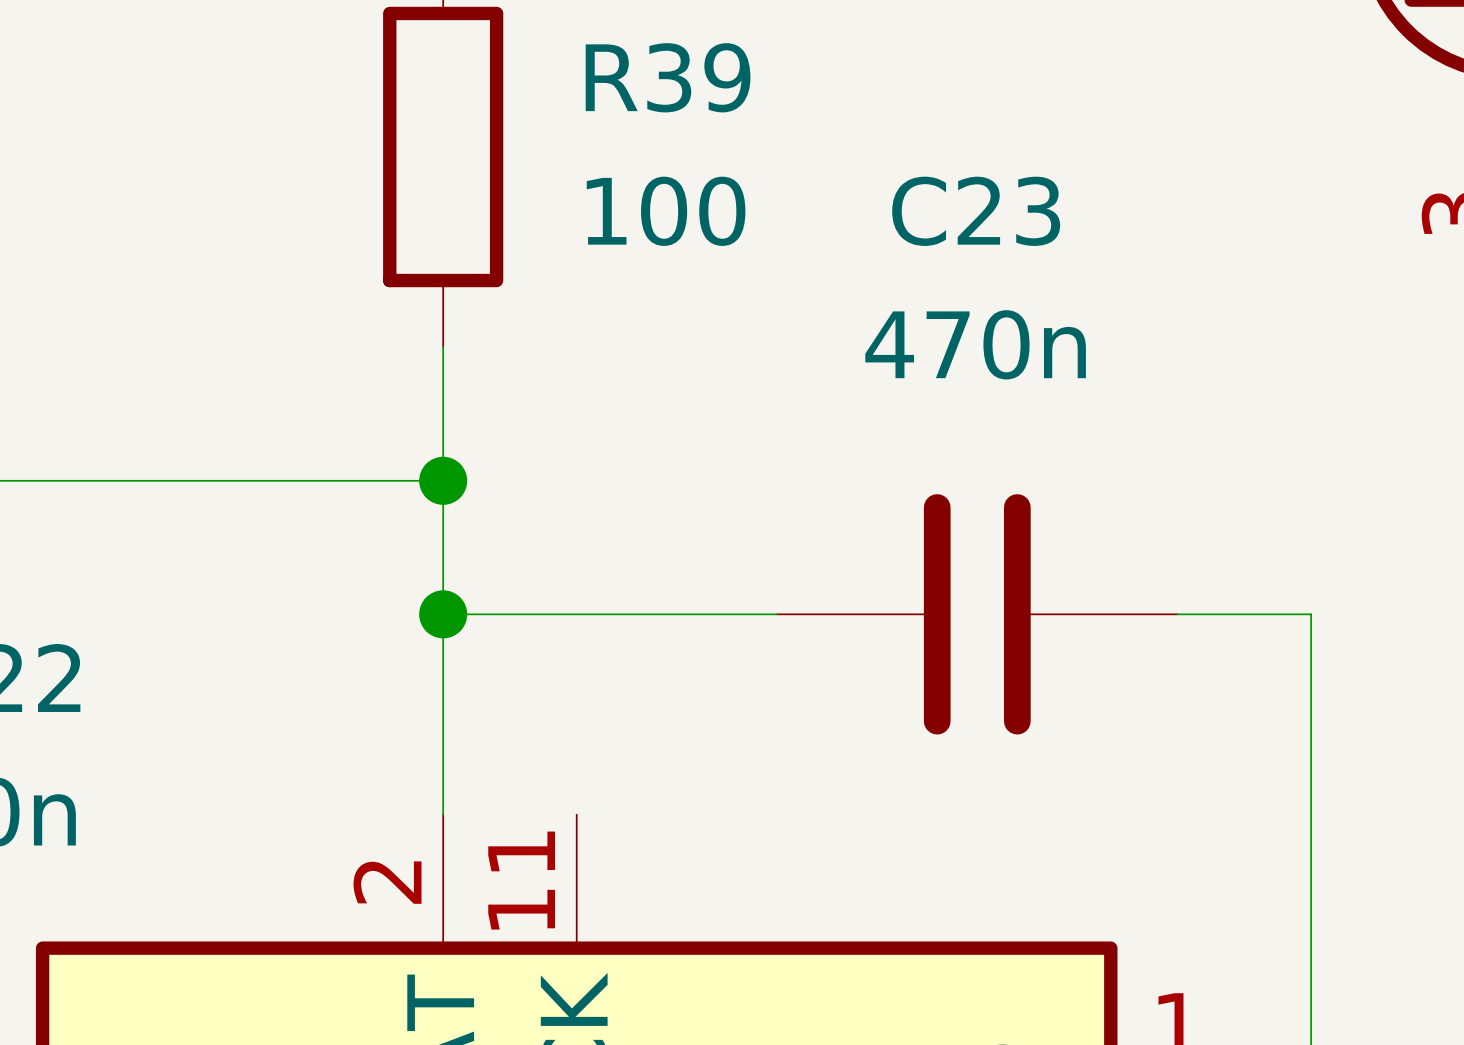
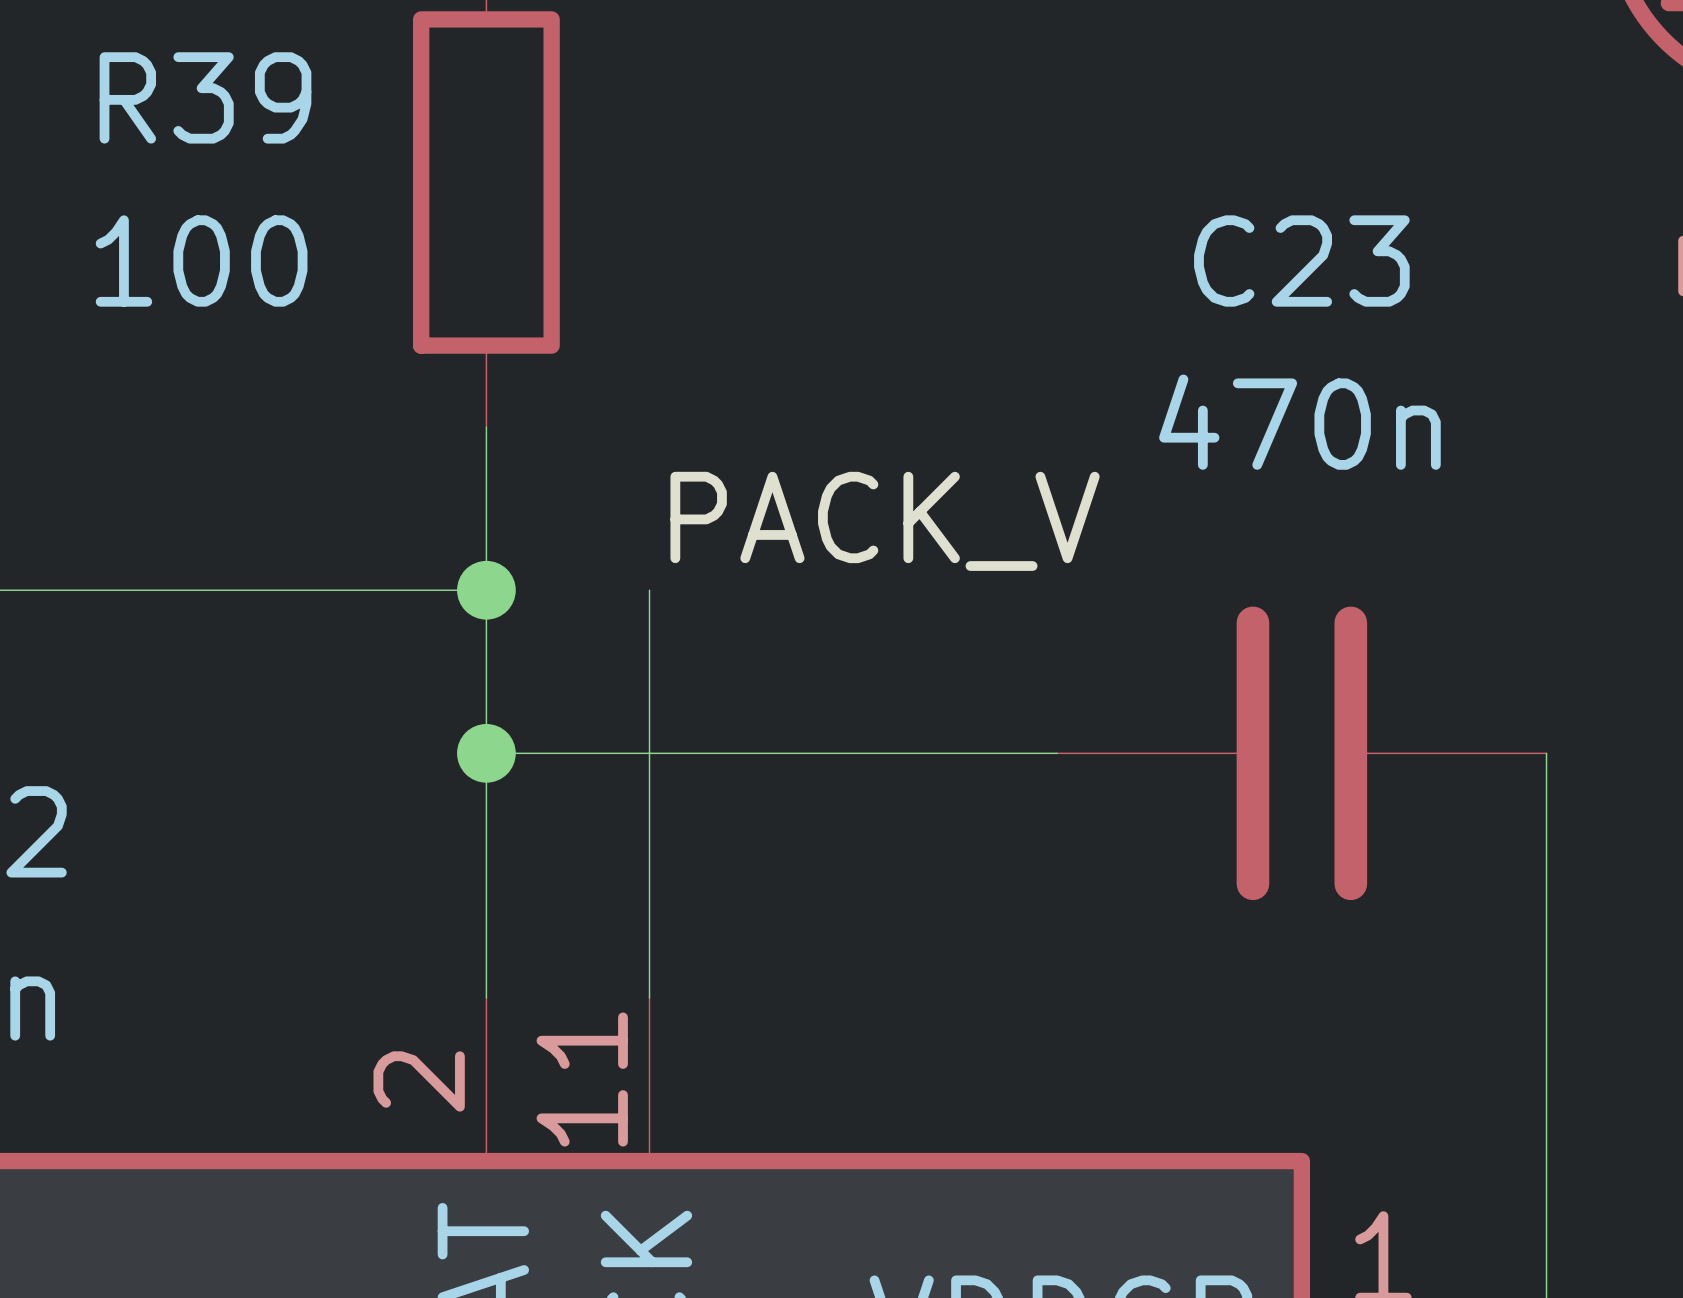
R39 name position: R39 (668, 77) -> R39 (205, 97)
R39 value position: 100 (666, 211) -> 100 (201, 261)
label: none -> PACK_V (885, 521)
wire: none -> (649, 590) (649, 997)
C23 position: (977, 614) -> (1301, 753)

